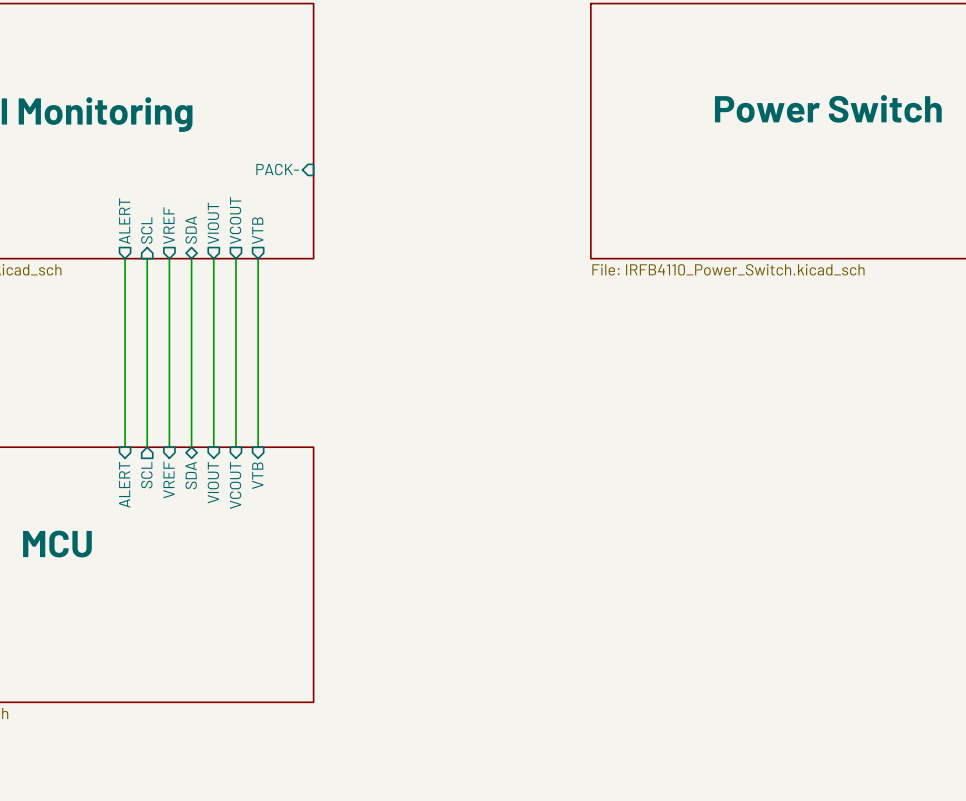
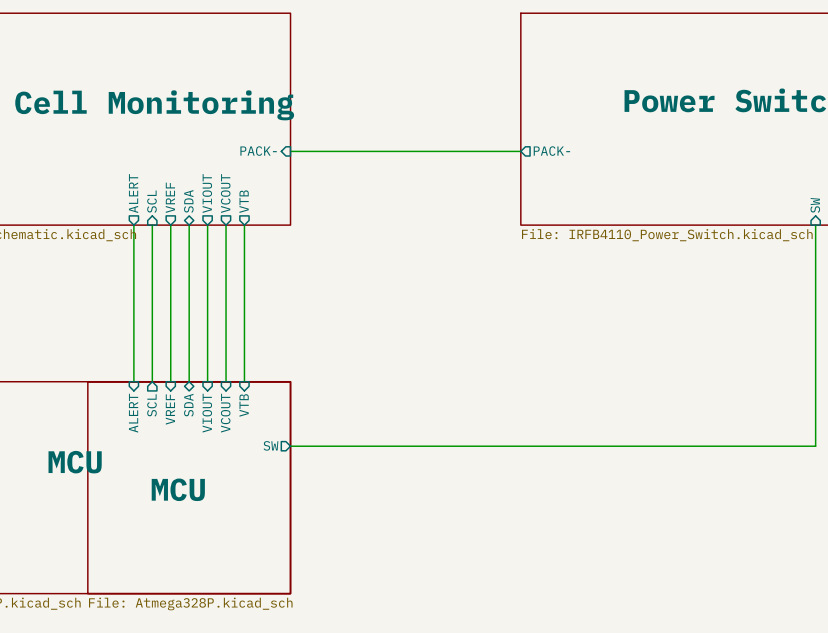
wire: none -> (290, 151) (520, 151)
sheet pin: none -> PACK- (551, 151)
sheet pin: none -> SW (815, 205)
wire: none -> (815, 225) (815, 446) (290, 446)
sheet pin: none -> SW (270, 445)
sheet MCU: none -> File: Atmega328P.kicad_sch (189, 487)

